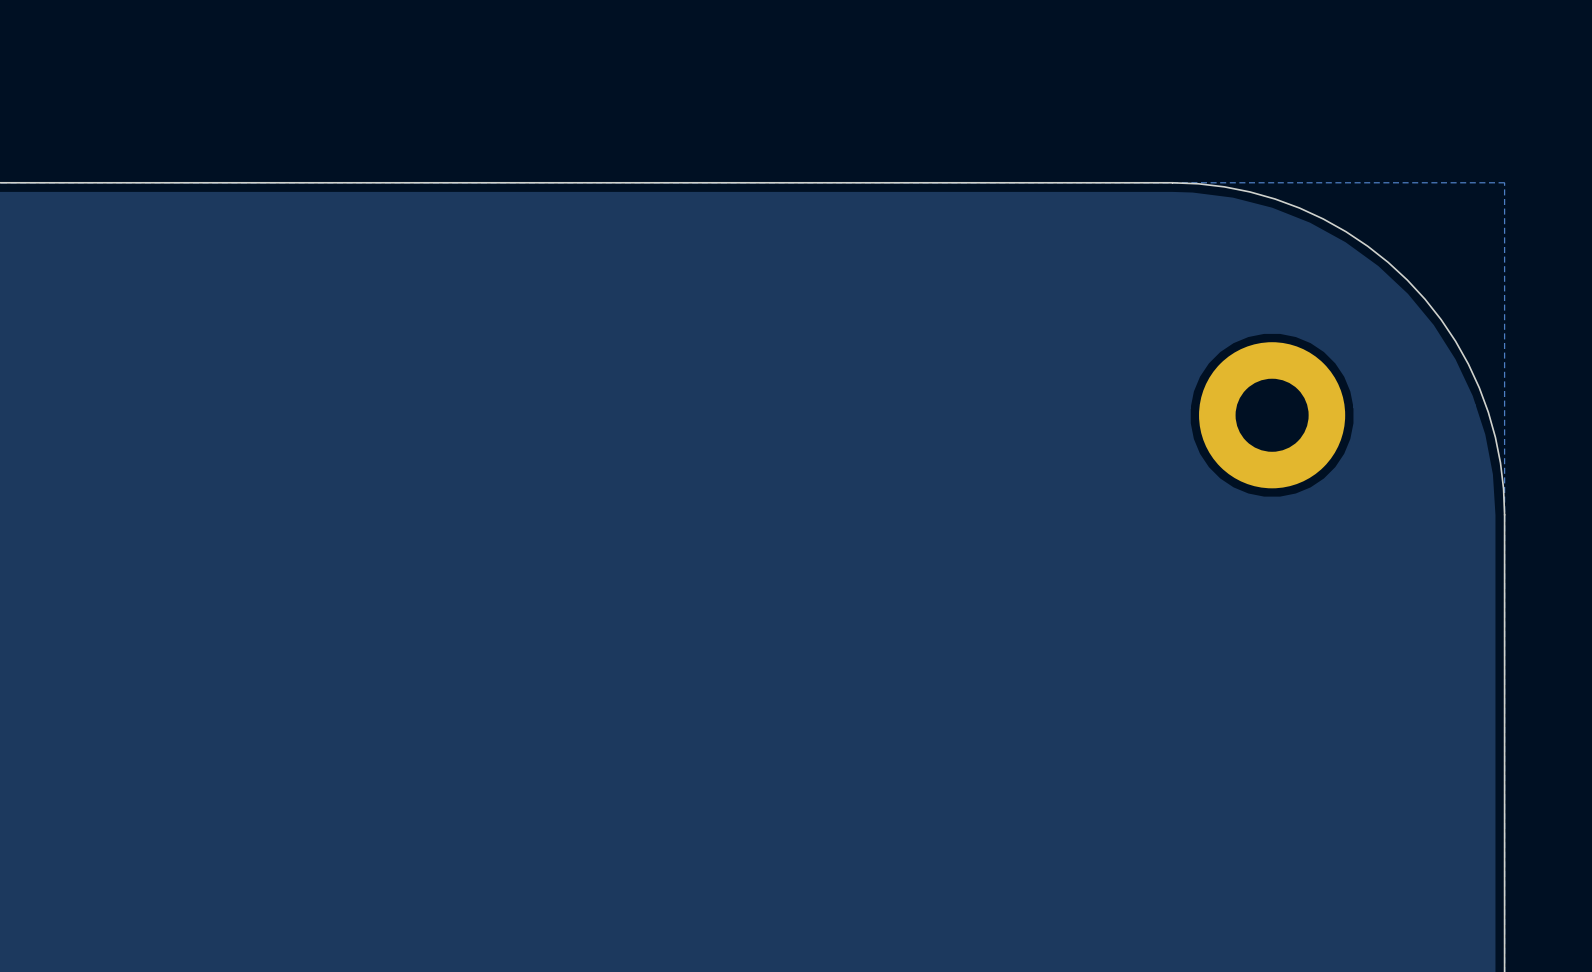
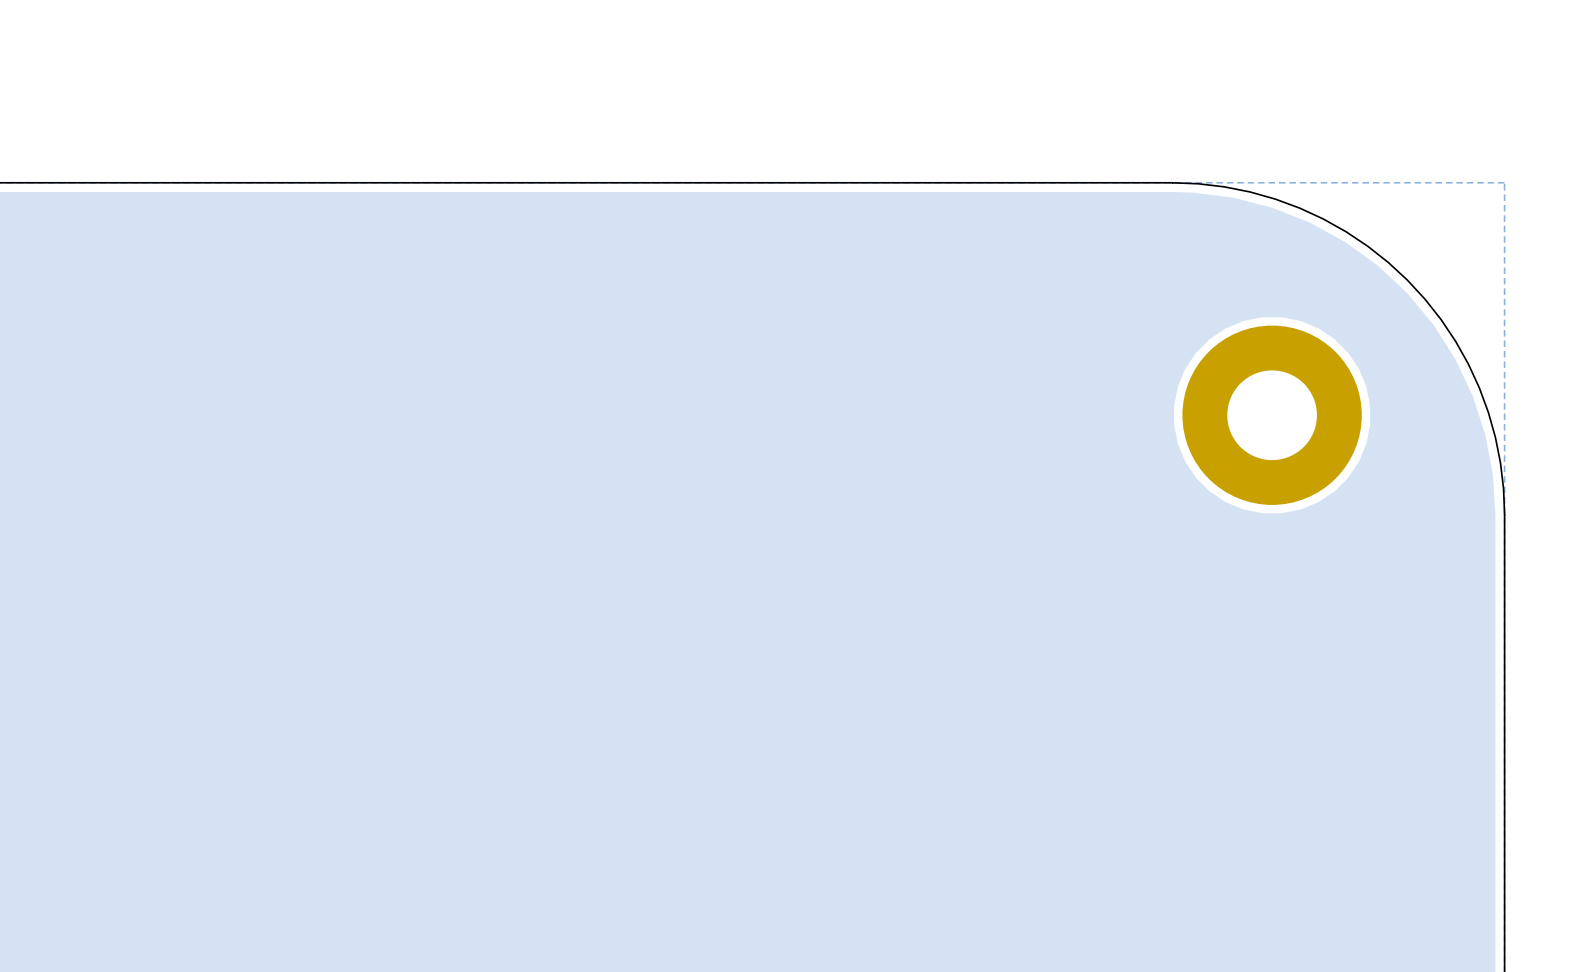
part footprint: [1199, 342, 1346, 489] -> [1182, 325, 1362, 505]

